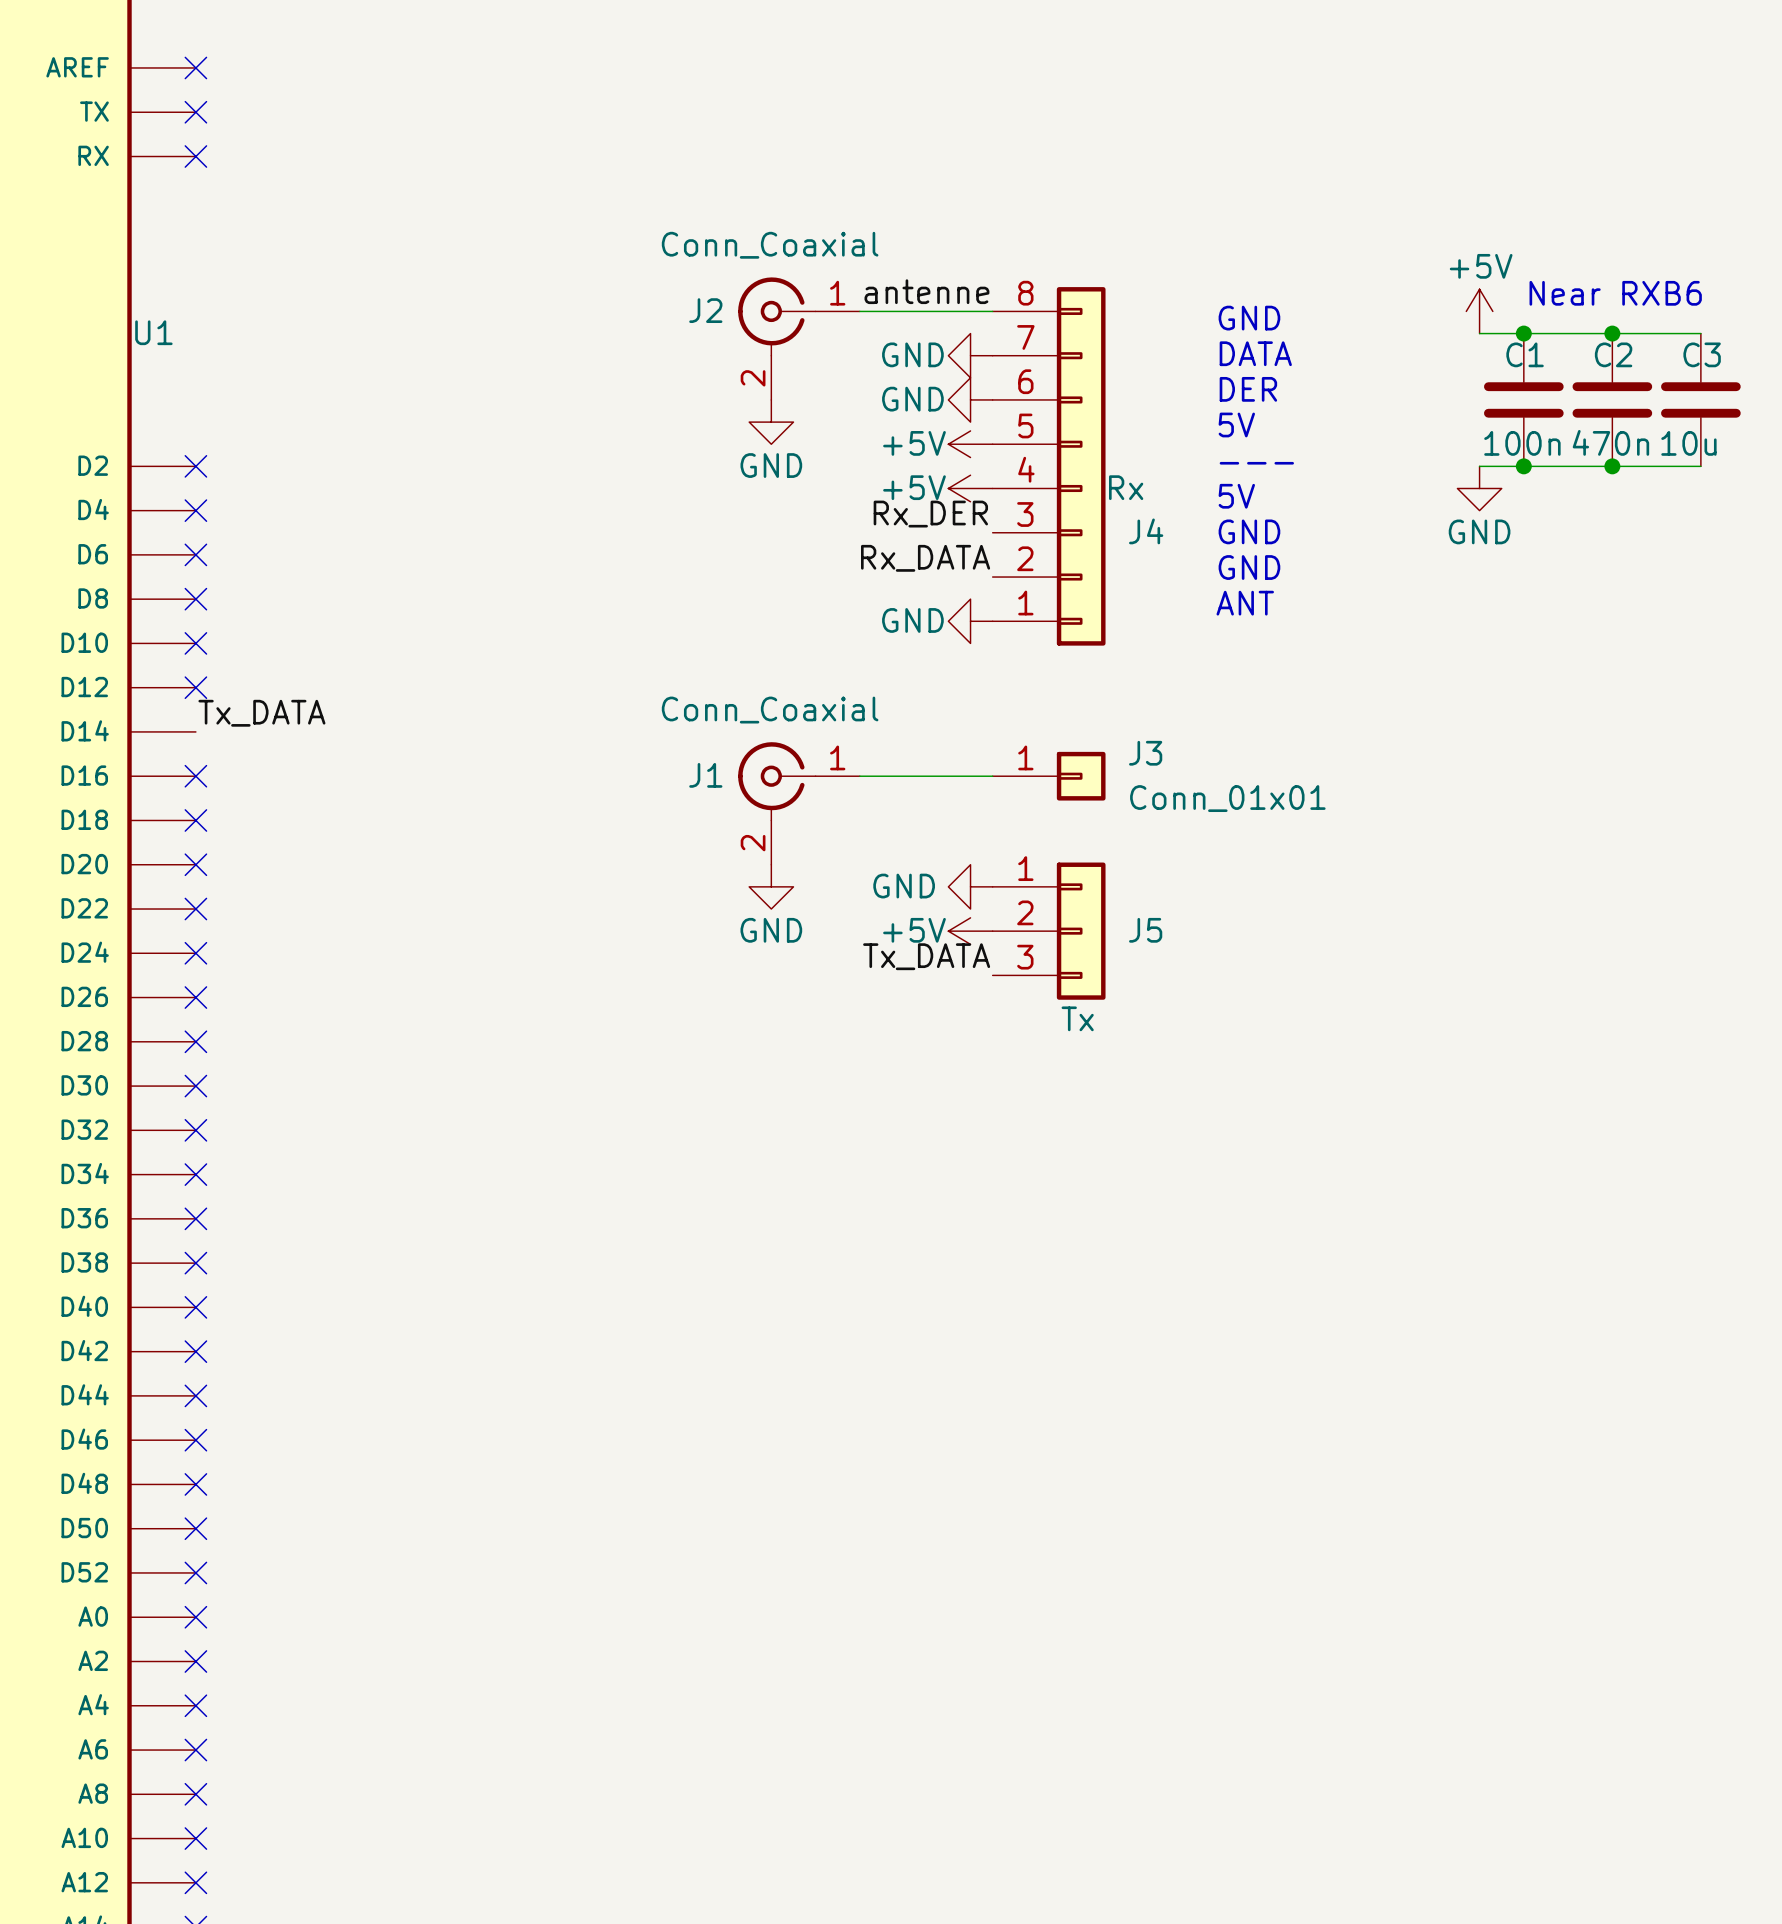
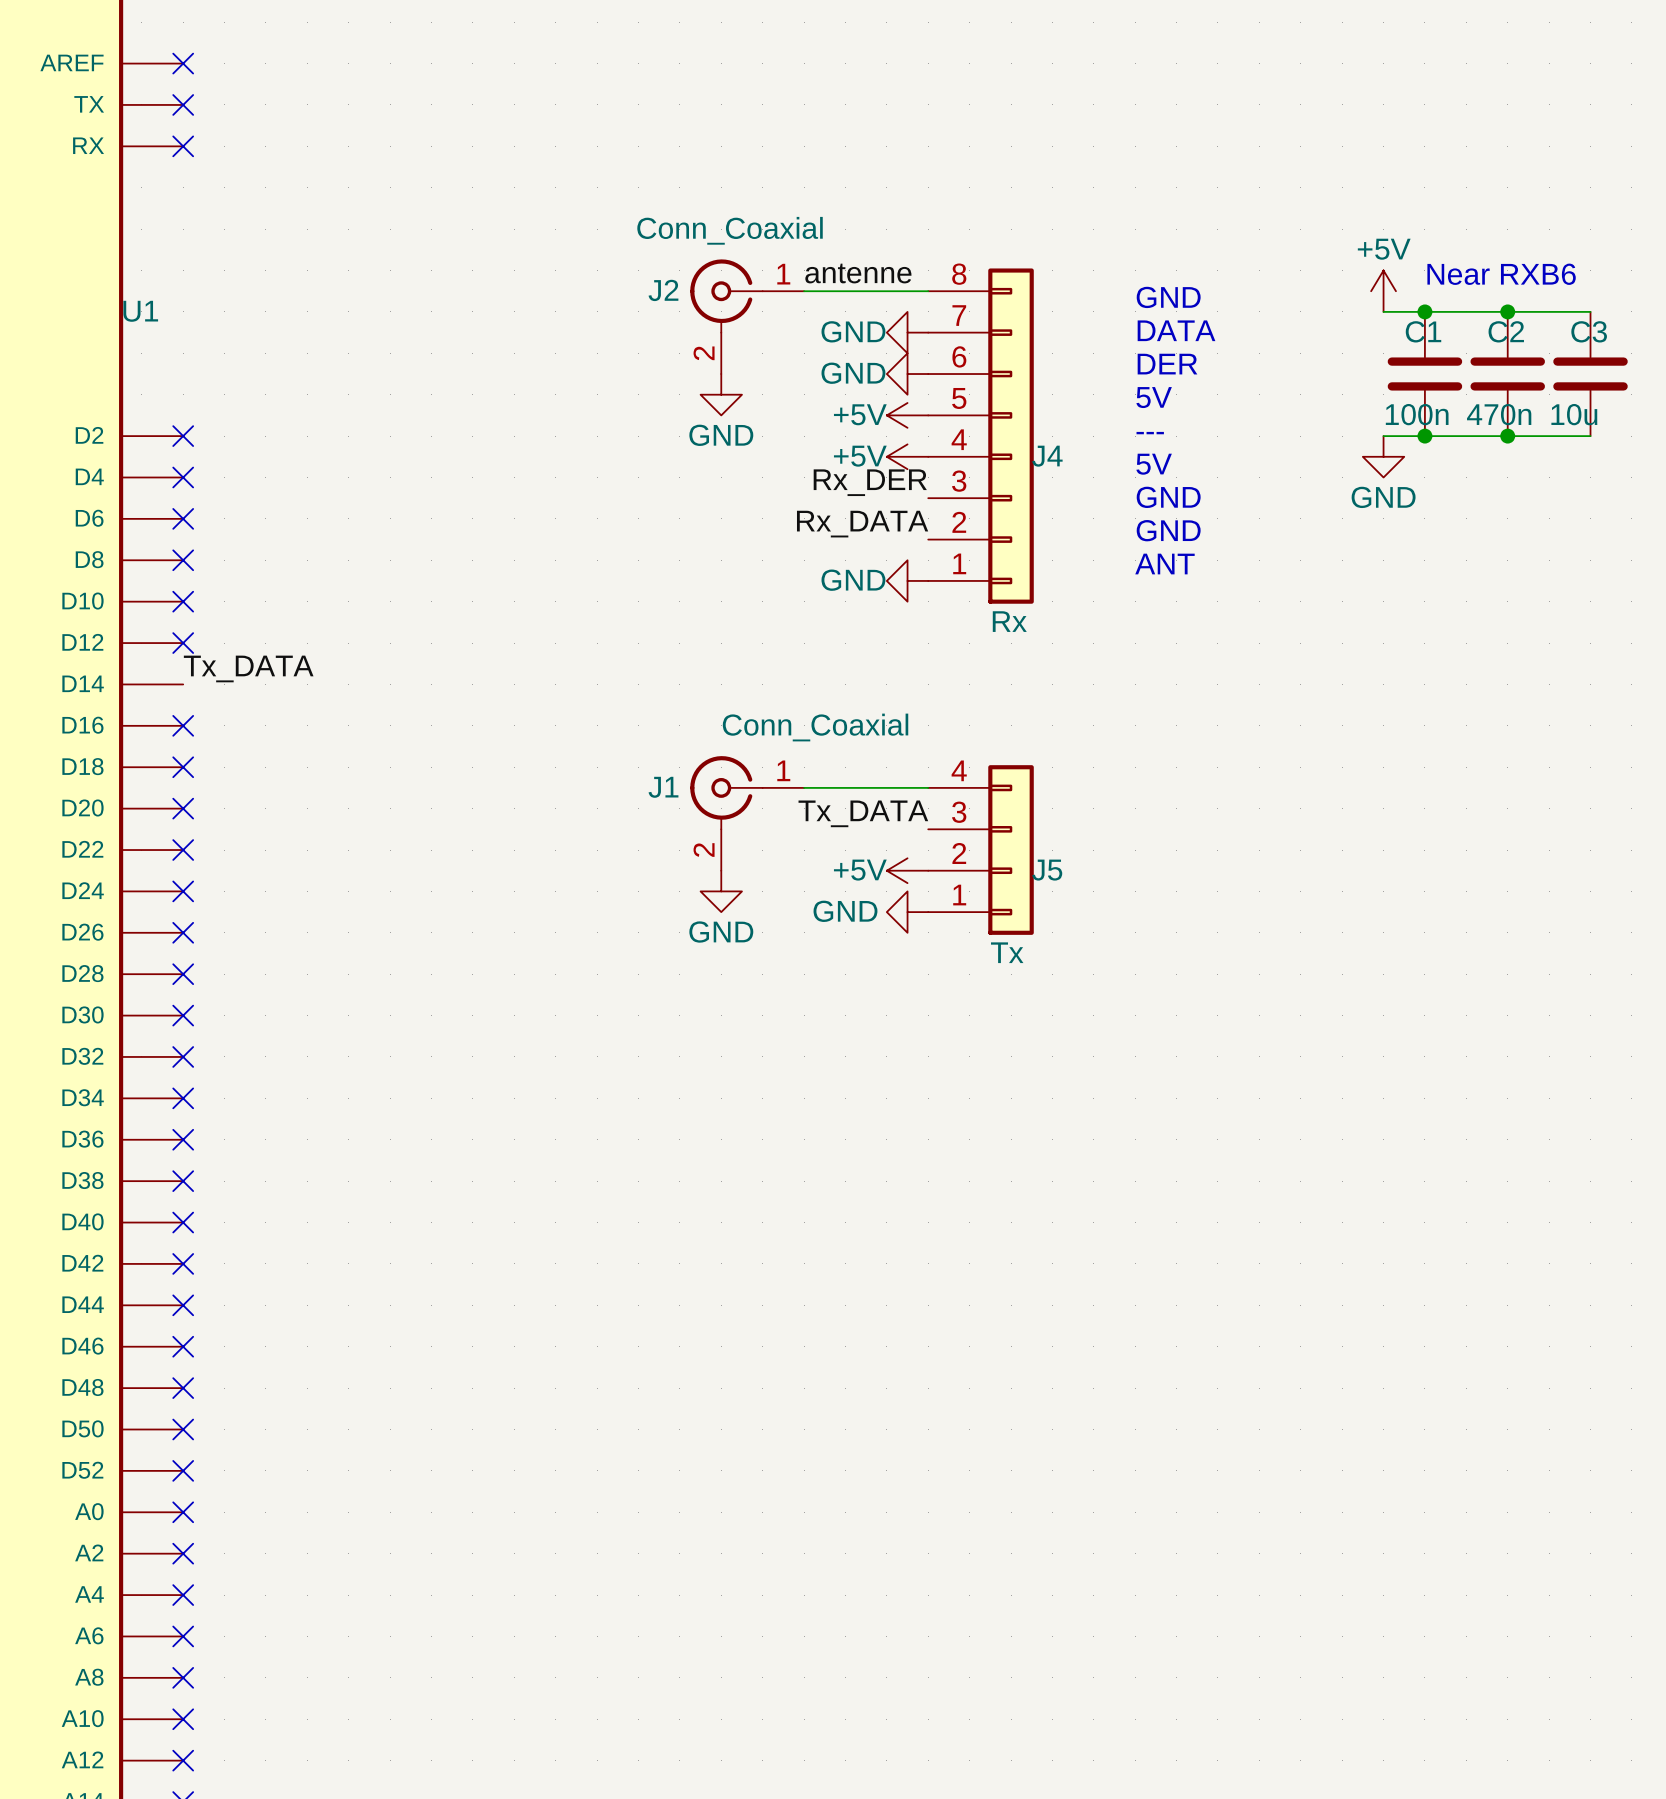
J4 value position: Rx (1126, 487) -> Rx (1009, 621)
J4 name position: J4 (1146, 531) -> J4 (1047, 456)
J1 value position: Conn_Coaxial (770, 710) -> Conn_Coaxial (815, 727)
wire: (859, 776) (992, 776) -> (804, 787) (928, 787)
J3: Conn_01x01 (1049, 776) -> none
J1 position: (799, 803) -> (747, 813)
J5 symbol: [992, 862, 1106, 1000] -> [928, 765, 1034, 935]
power symbol position: GND (771, 886) -> GND (721, 891)
power symbol position: GND (970, 886) -> GND (907, 912)
label position: Tx_DATA (926, 956) -> Tx_DATA (863, 813)

